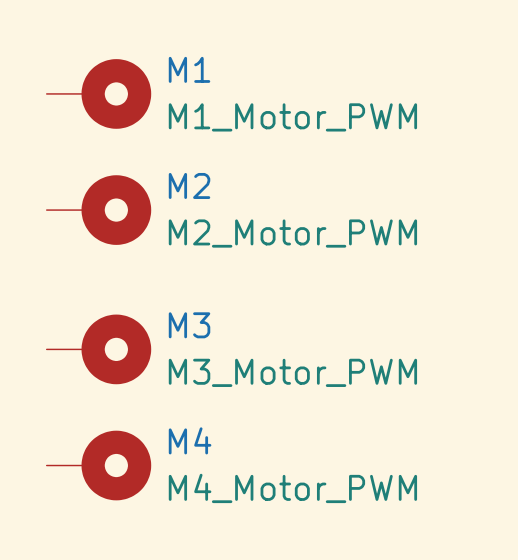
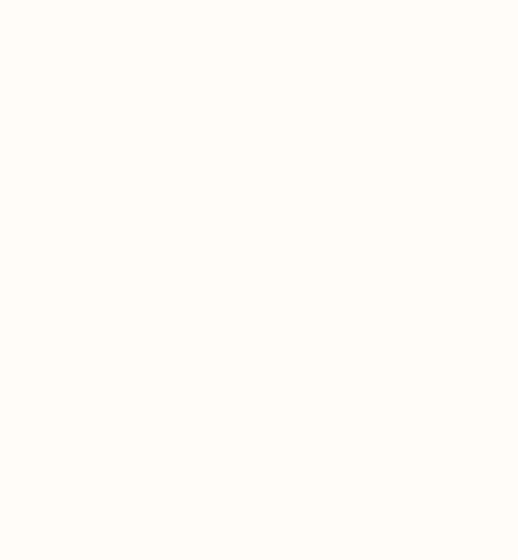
M1: M1_Motor_PWM (98, 93) -> none
M2: M2_Motor_PWM (98, 210) -> none
M3: M3_Motor_PWM (98, 349) -> none
M4: M4_Motor_PWM (98, 465) -> none

